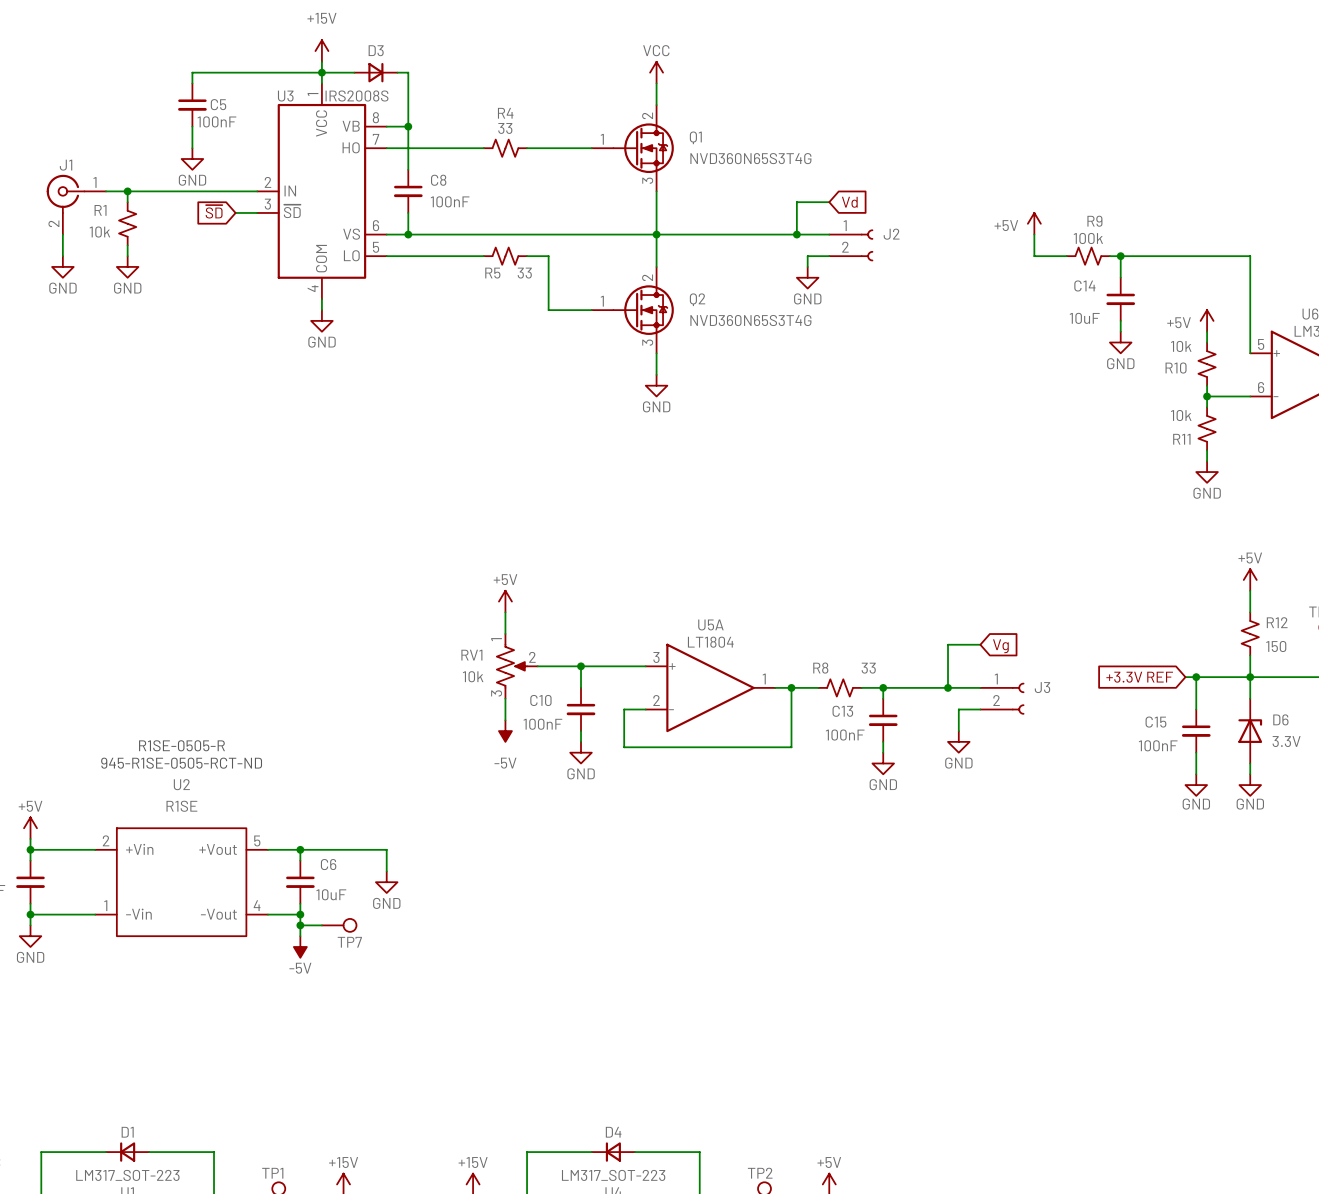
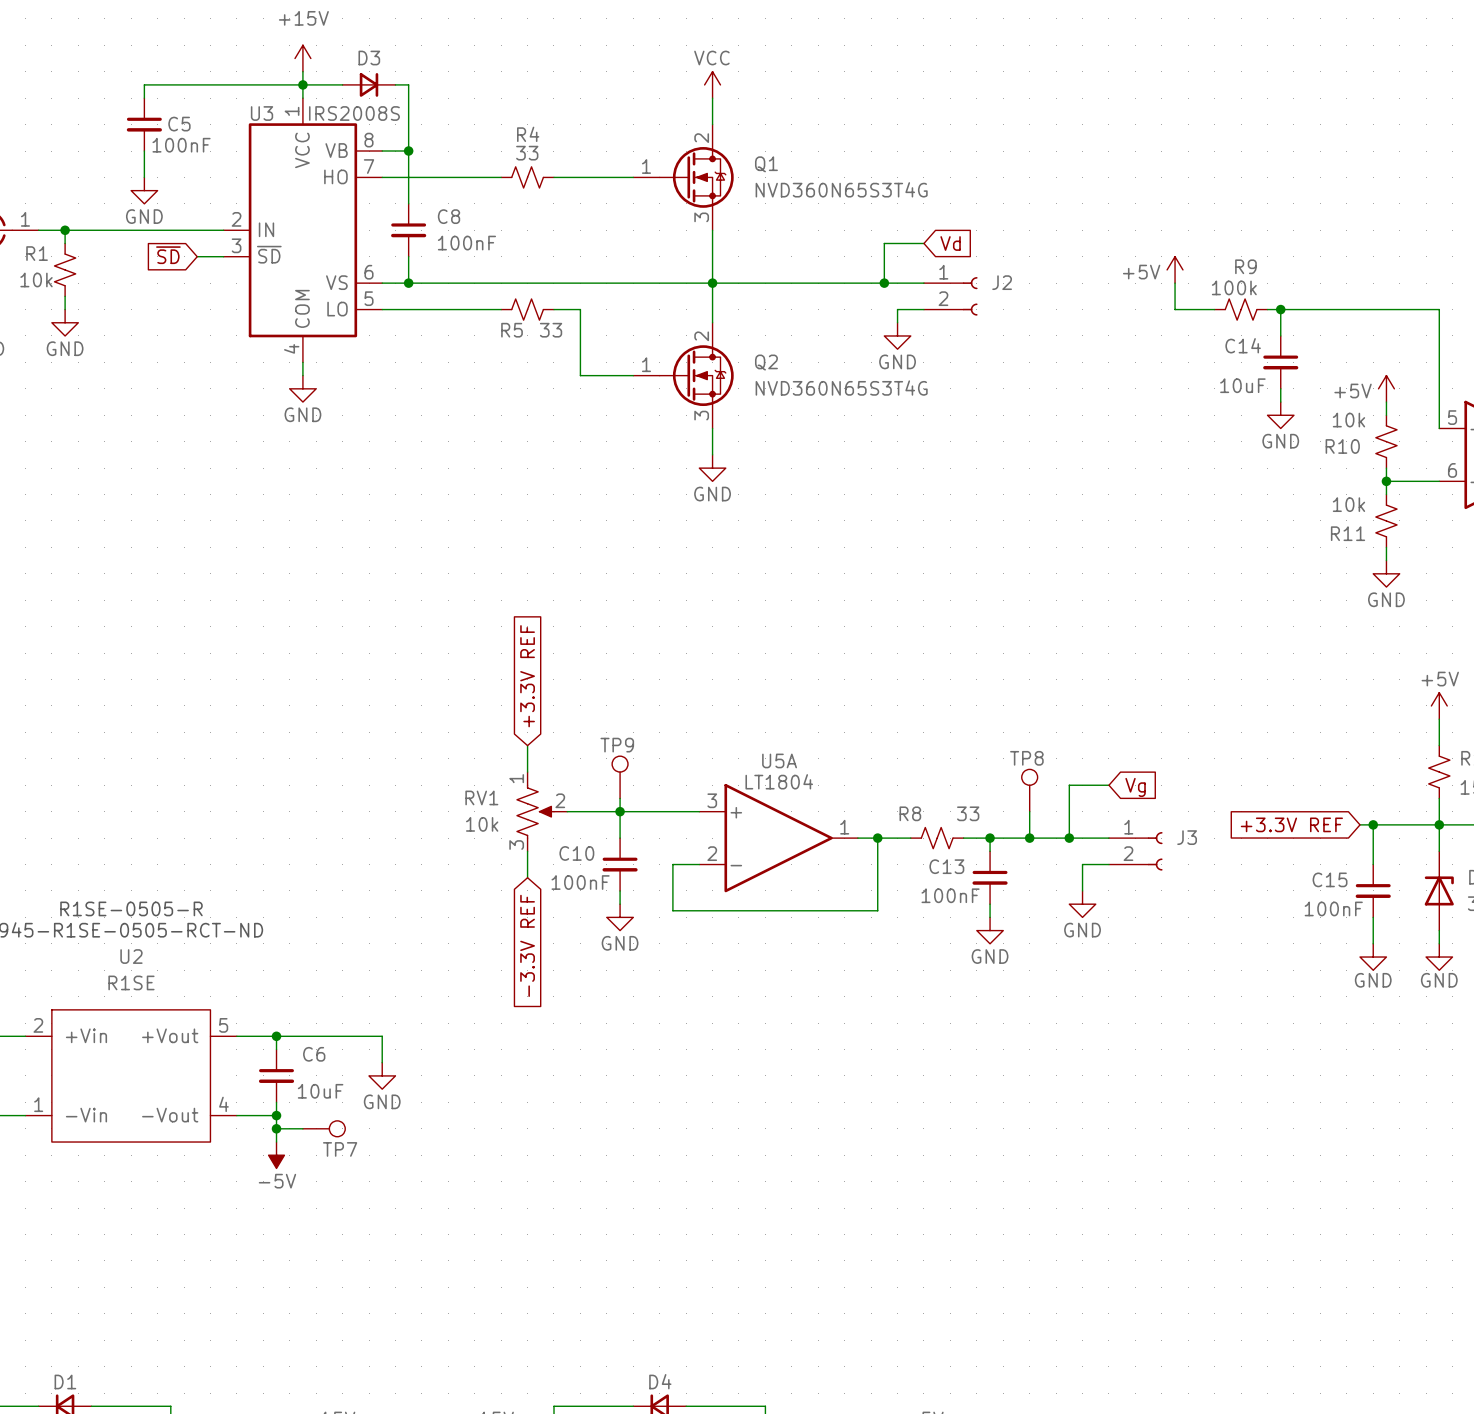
global label: none -> +3.3V REF (527, 676)
power symbol: +5V (505, 601) -> none
TP9: none -> (620, 777)
TP8: none -> (1029, 790)
wire: none -> (620, 798) (620, 811)
wire: none -> (1029, 811) (1029, 838)
junction: none -> (1029, 838)
power symbol: -5V (505, 731) -> none
global label: none -> -3.3V REF (527, 945)

